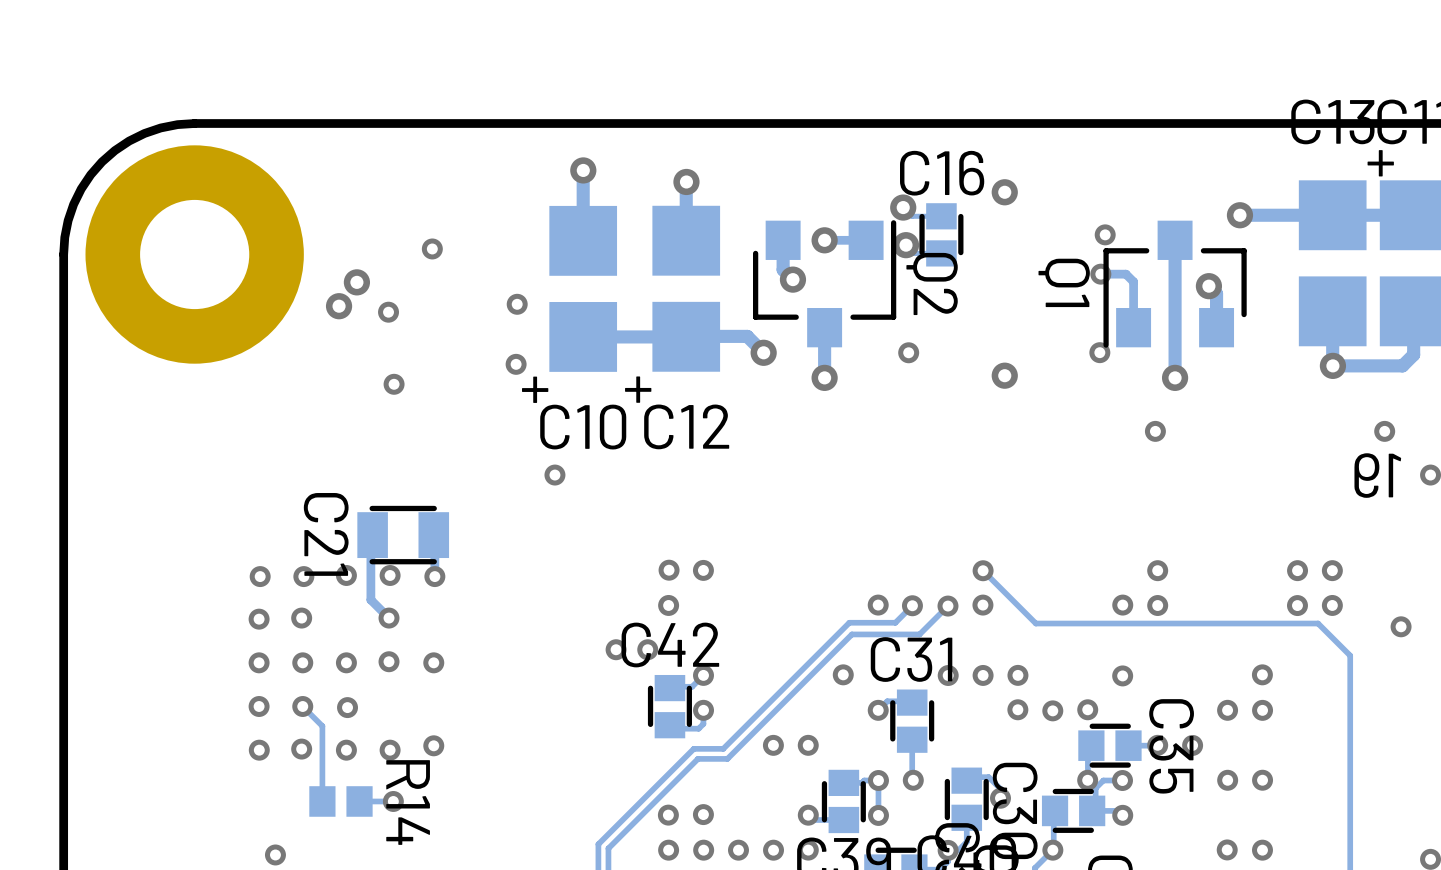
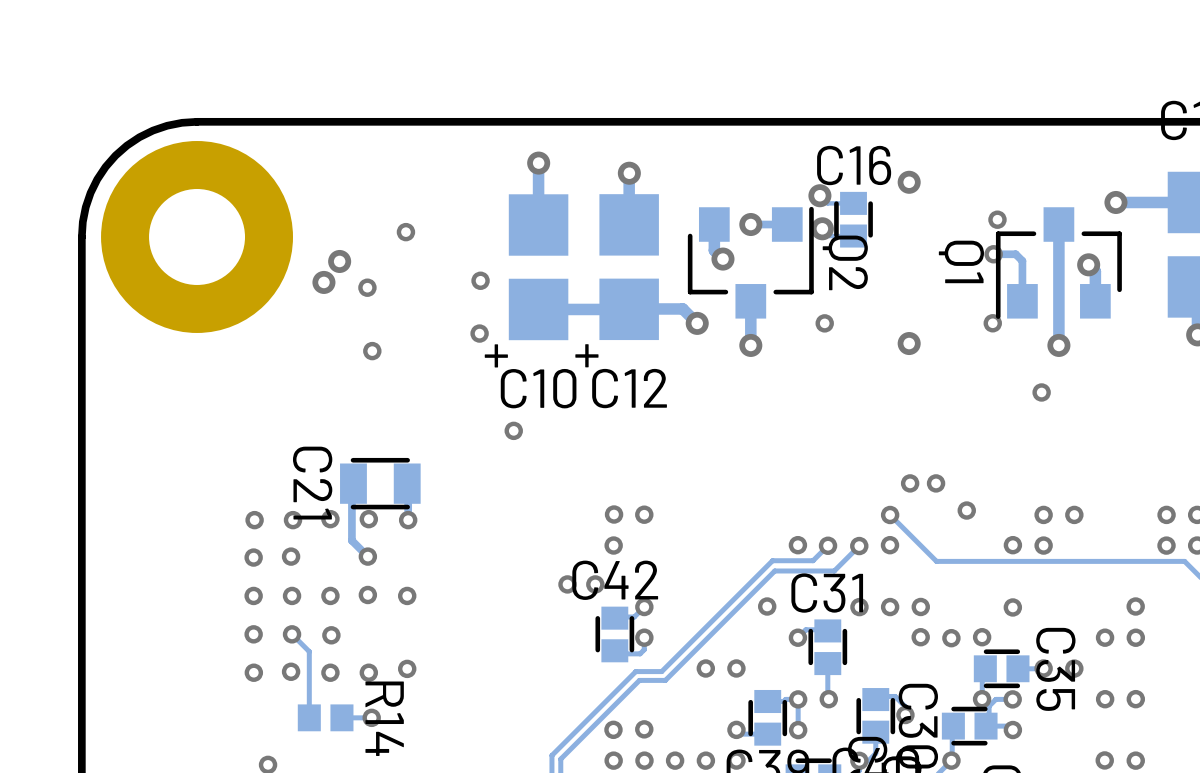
via: none -> (910, 483)
via: none -> (936, 483)
via: none -> (966, 510)
via: none -> (1074, 514)

